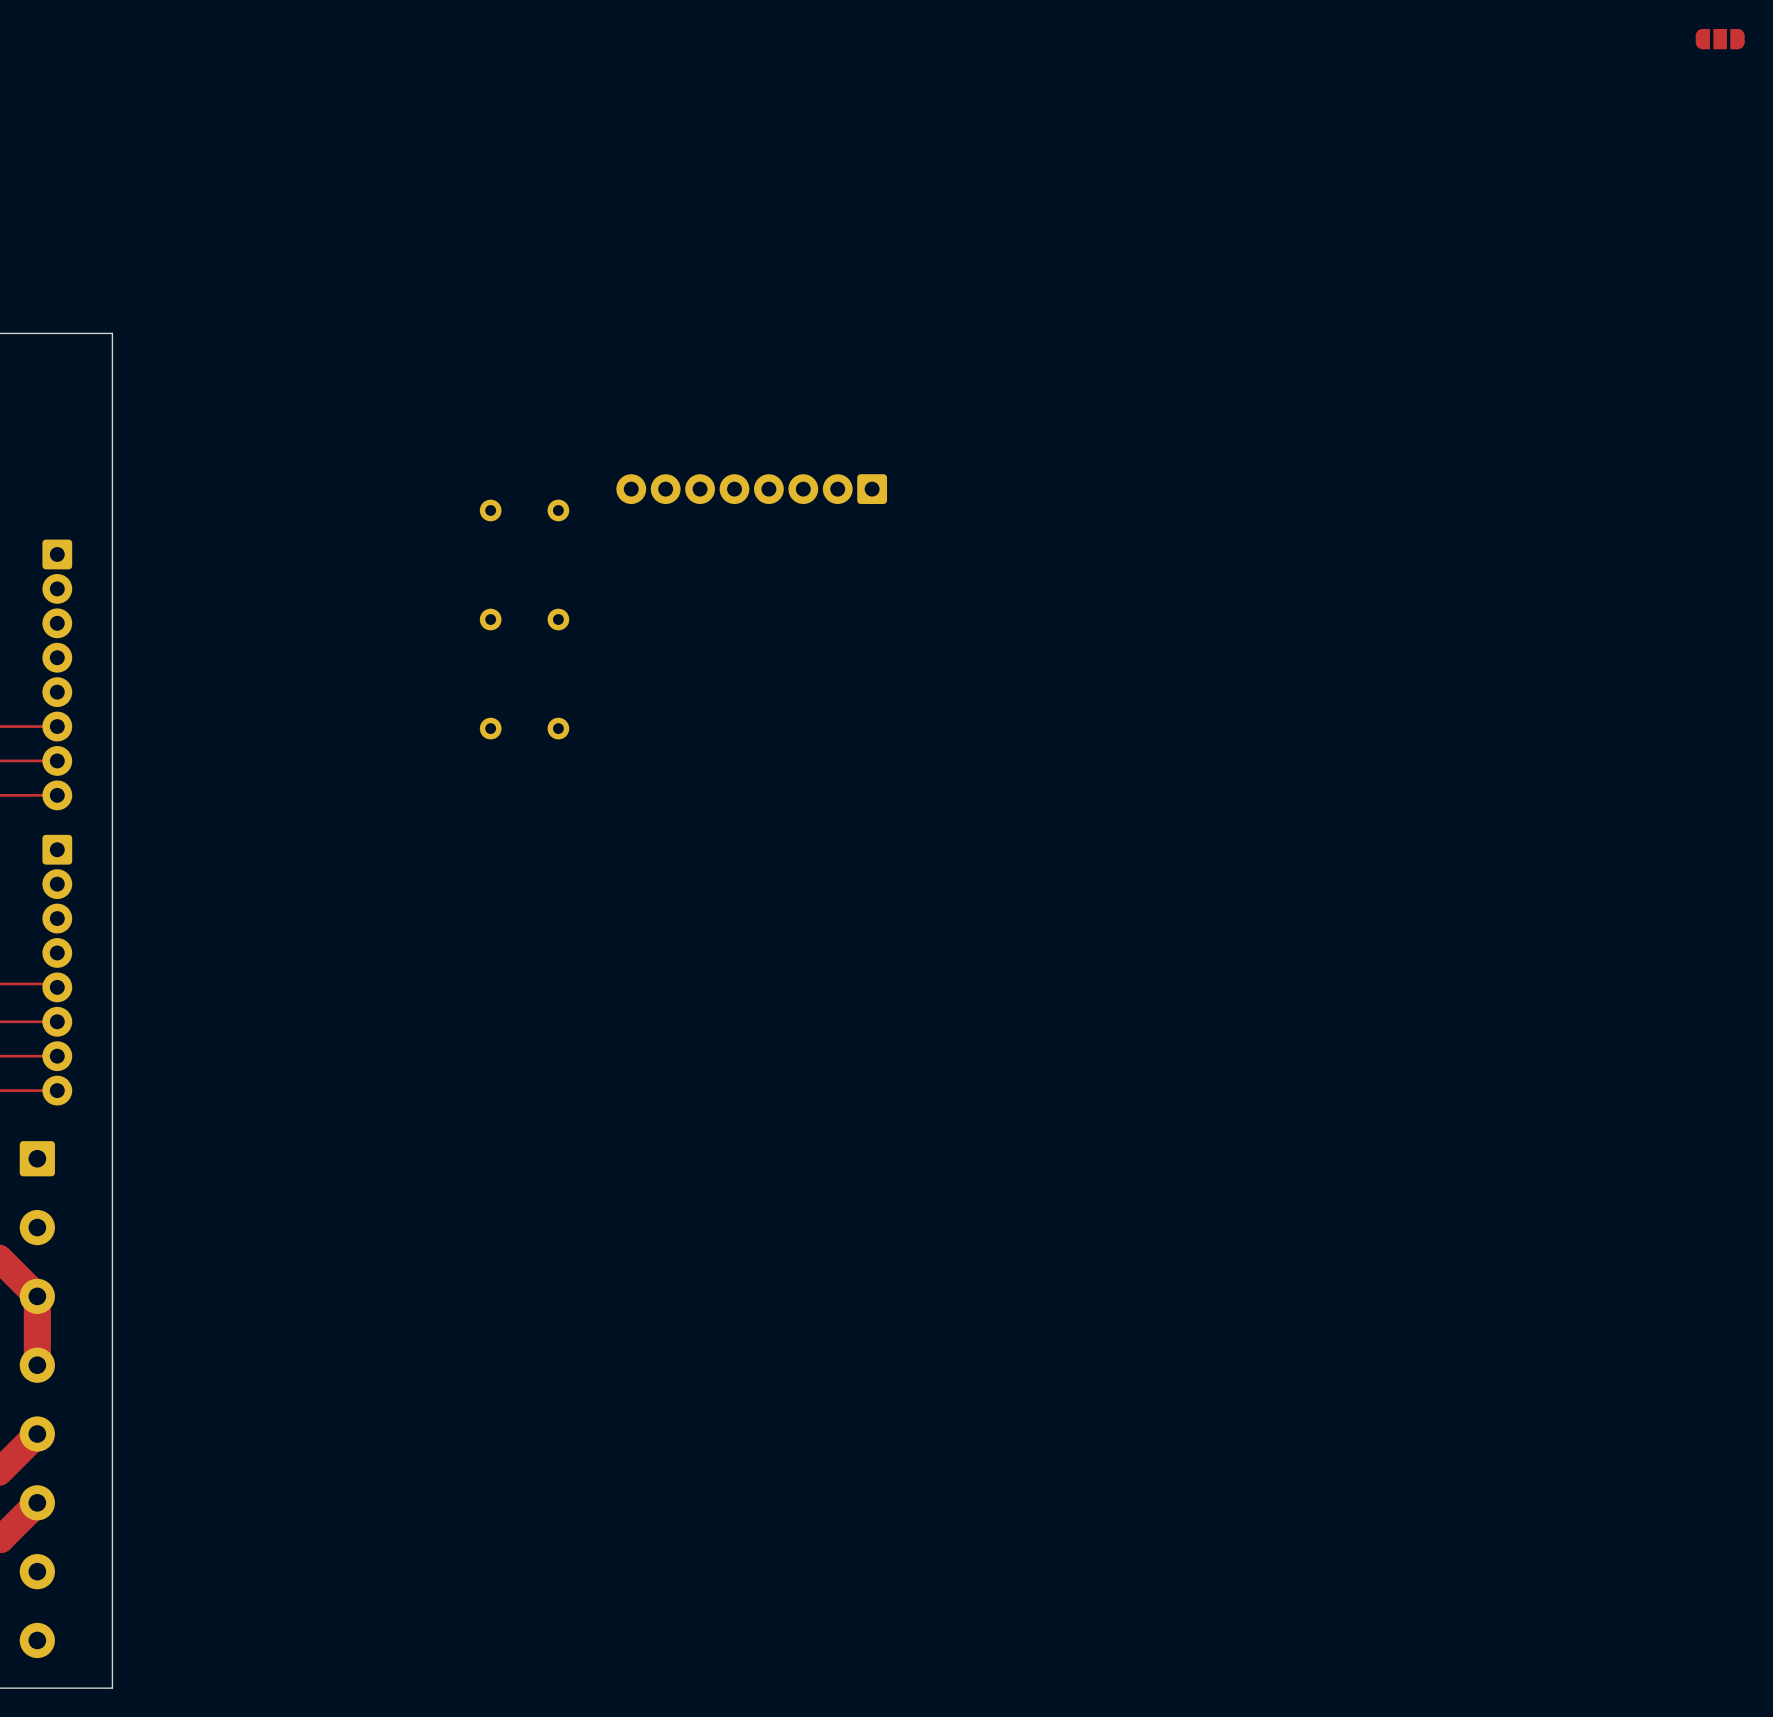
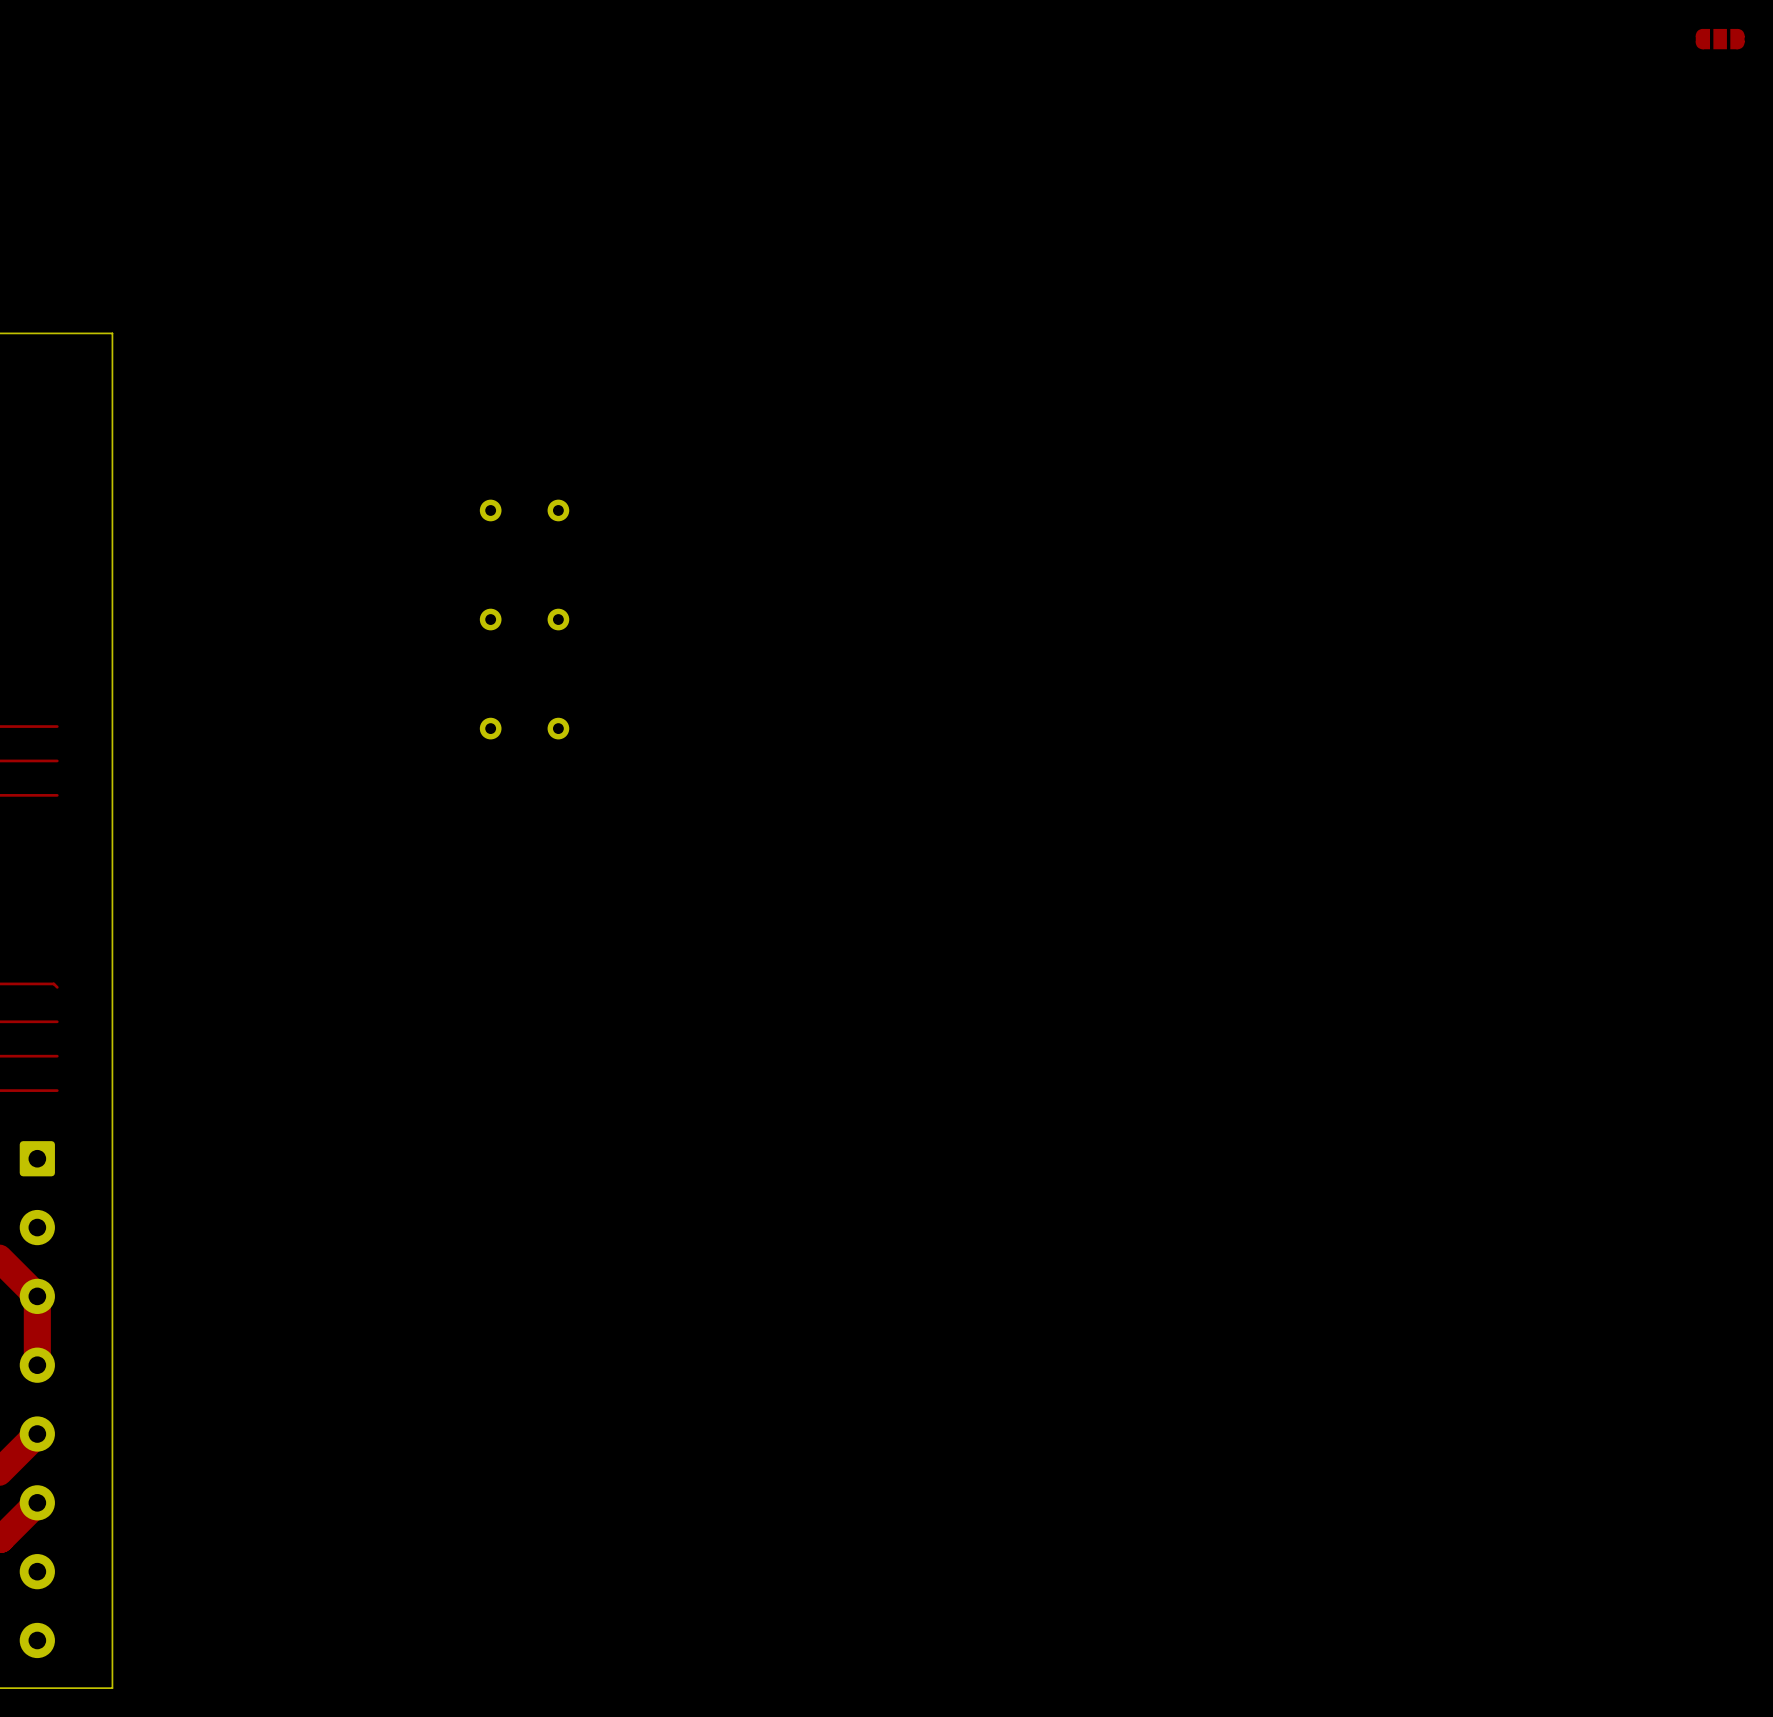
part: (751, 489) -> none
part: (57, 674) -> none
part: (57, 970) -> none

